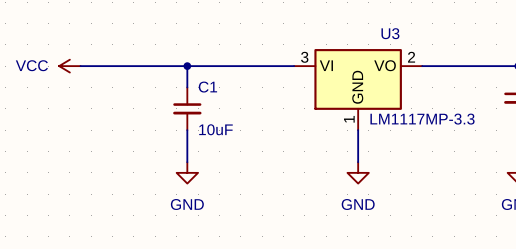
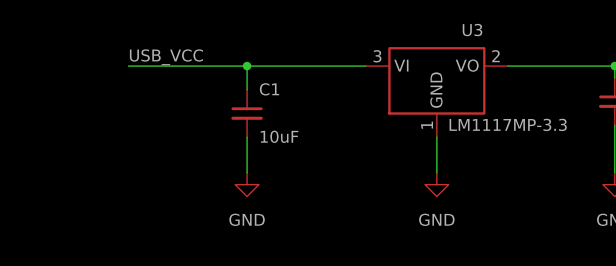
label: none -> USB_VCC (166, 57)
power symbol: VCC (69, 66) -> none

